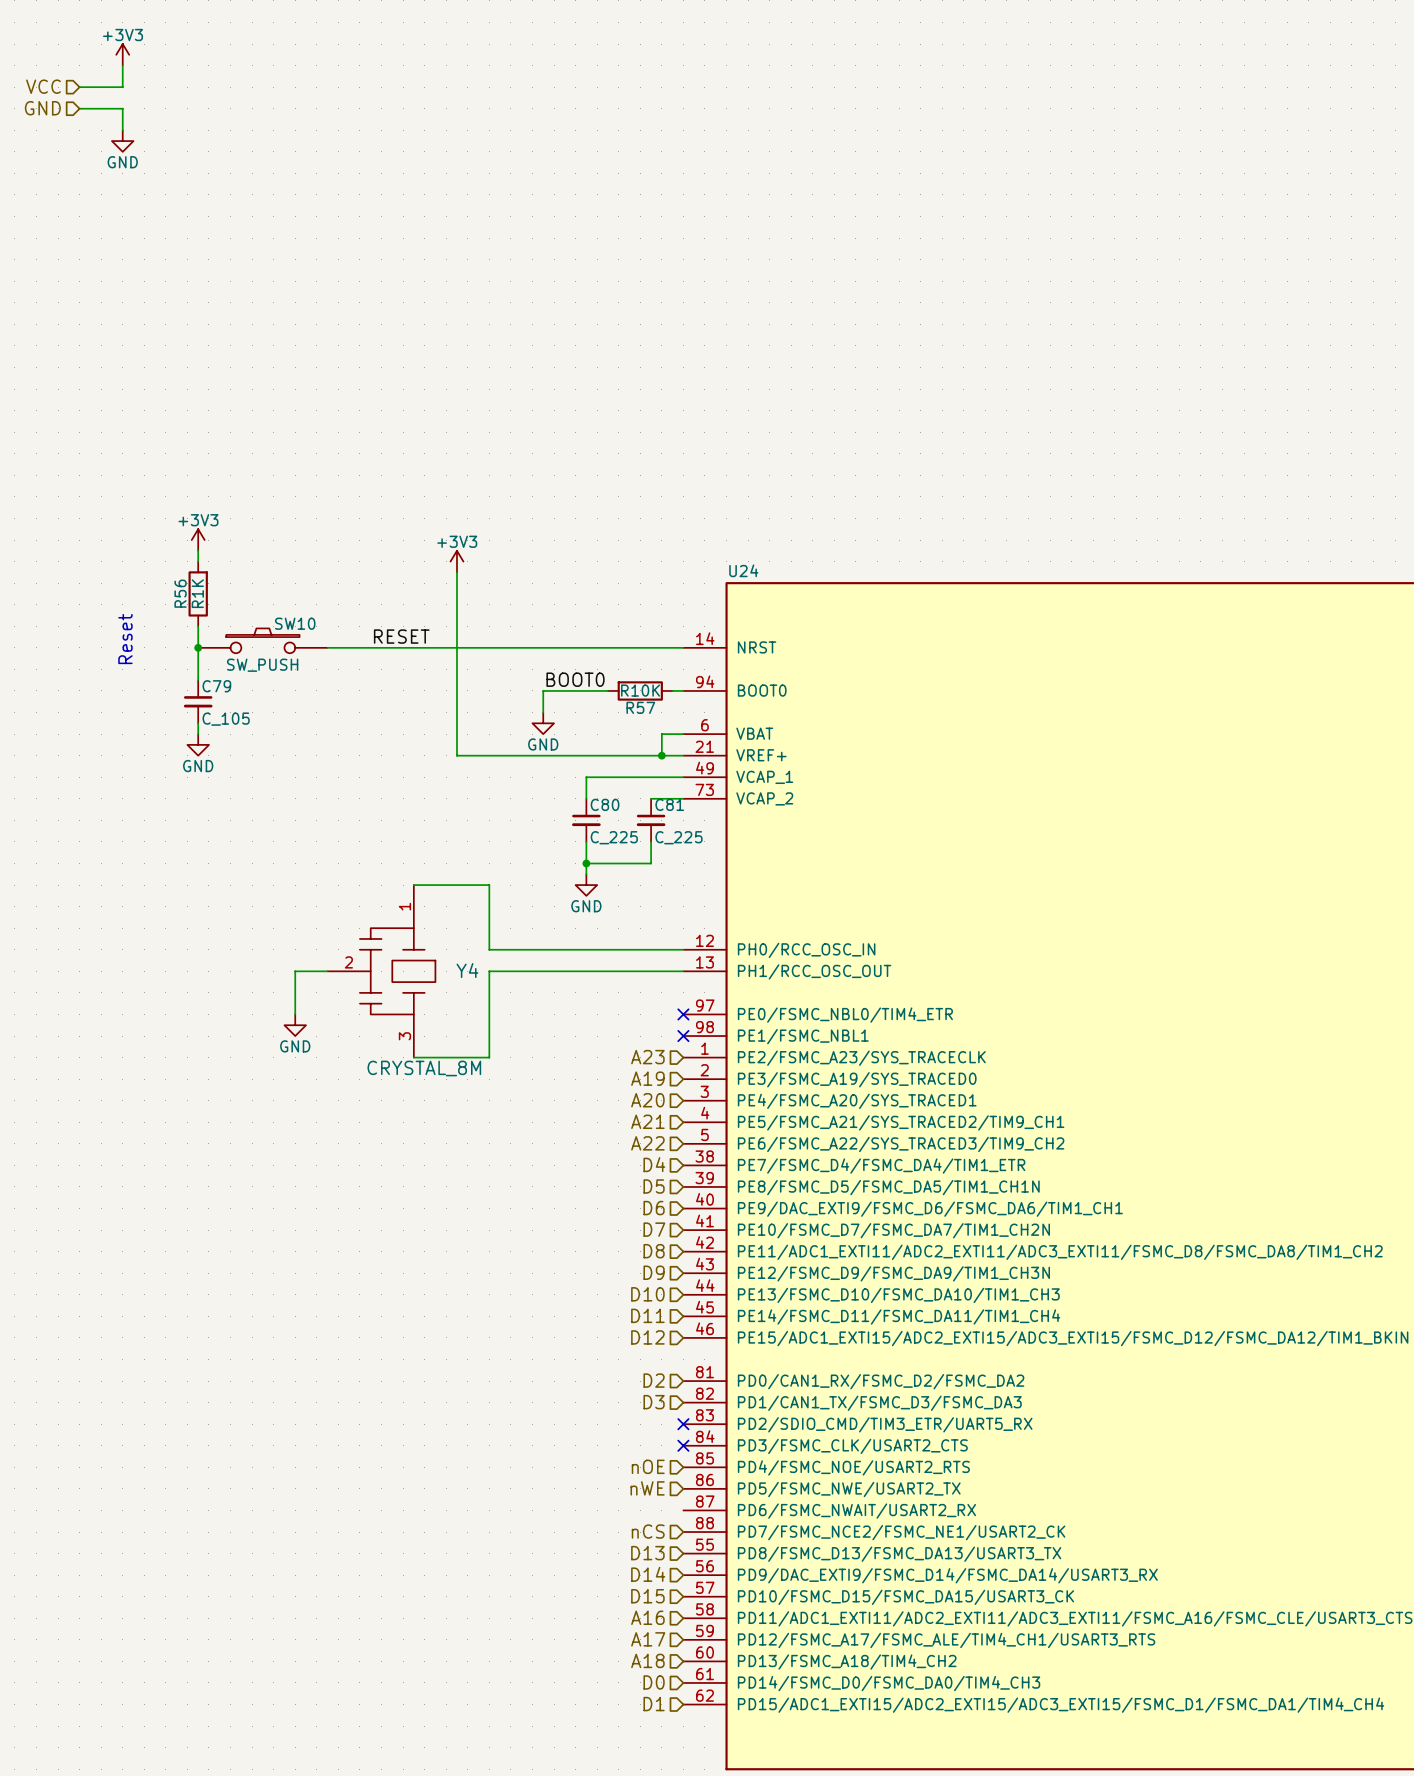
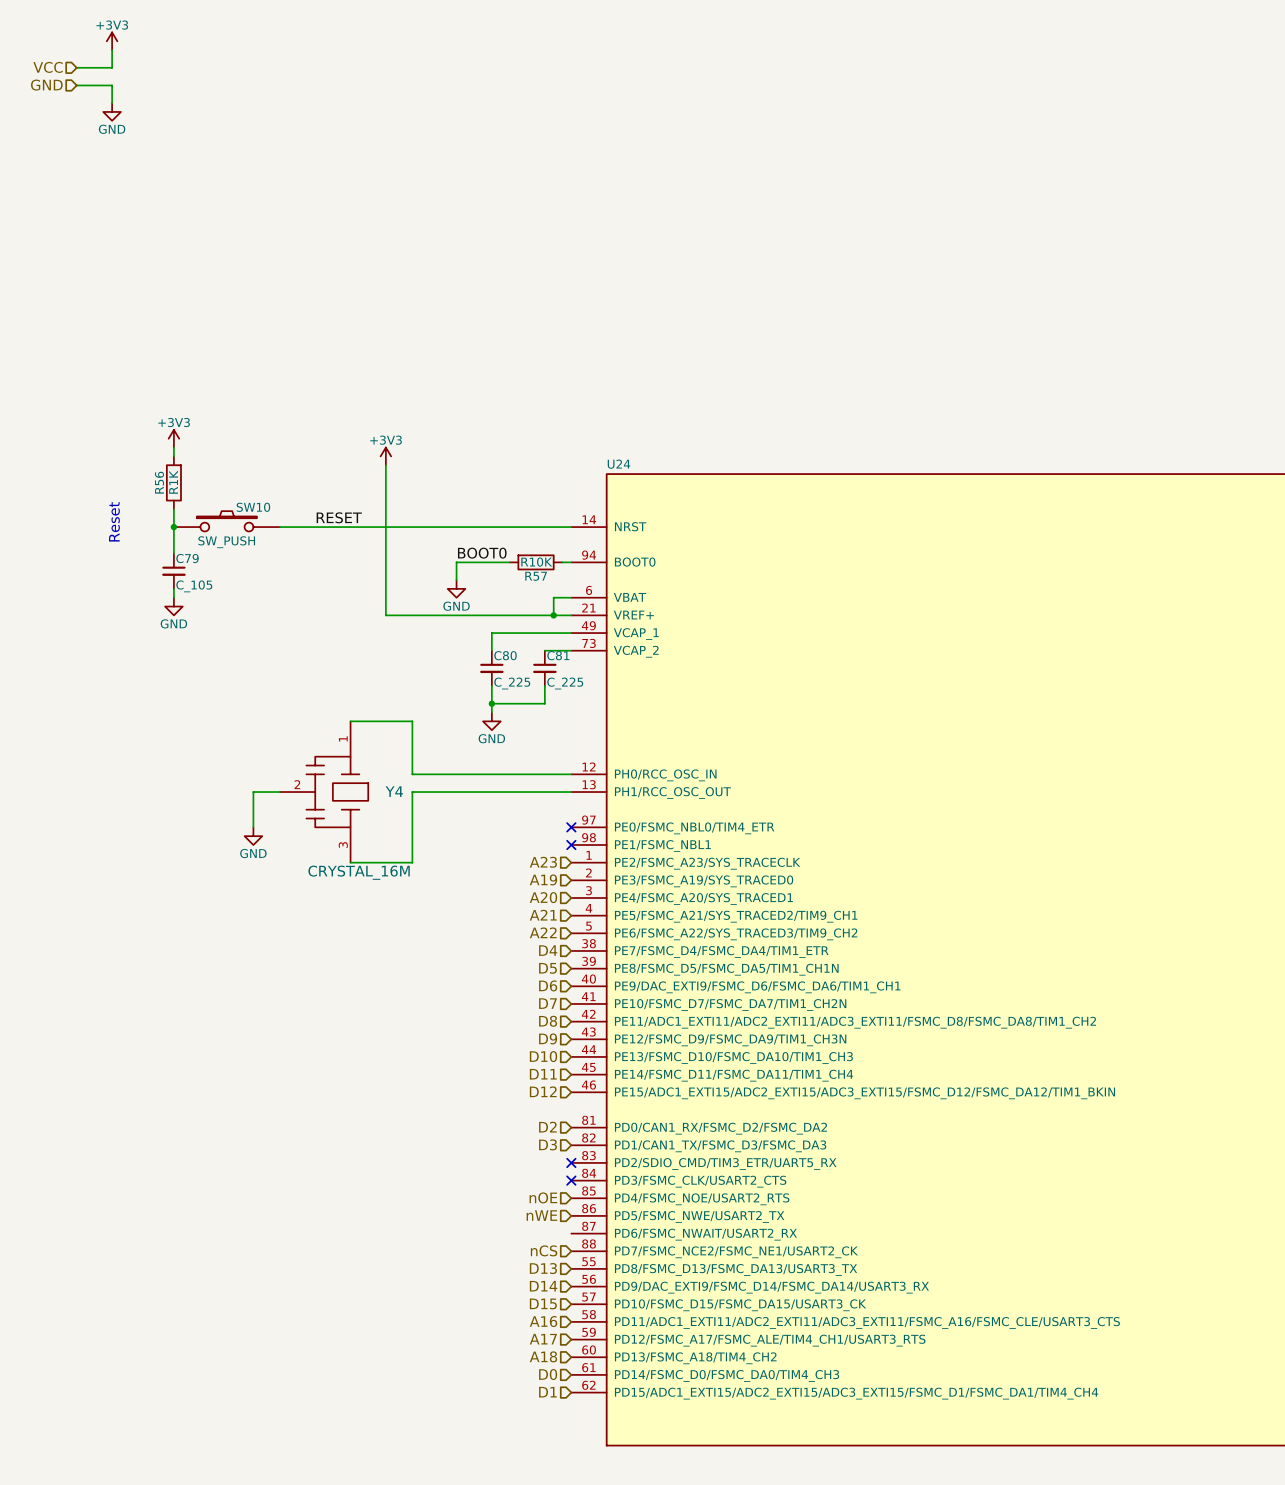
Y4 value: CRYSTAL_8M (424, 1068) -> CRYSTAL_16M (359, 872)

